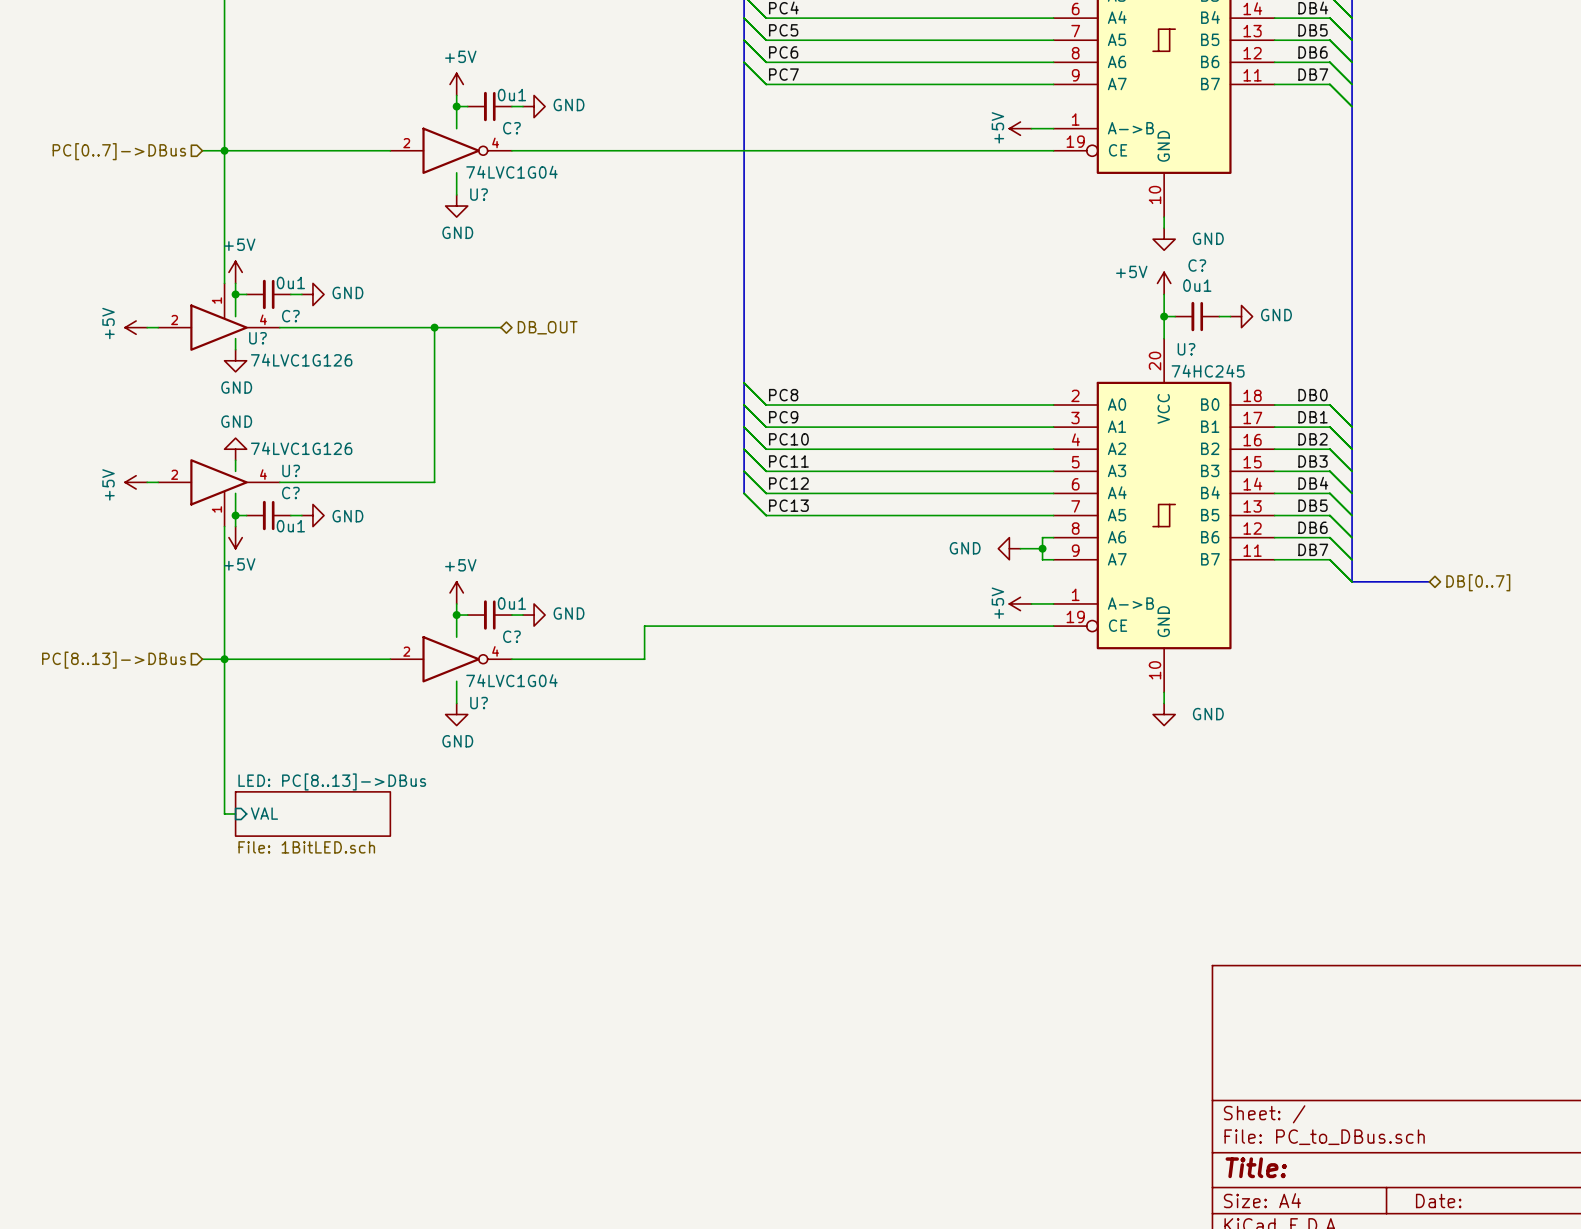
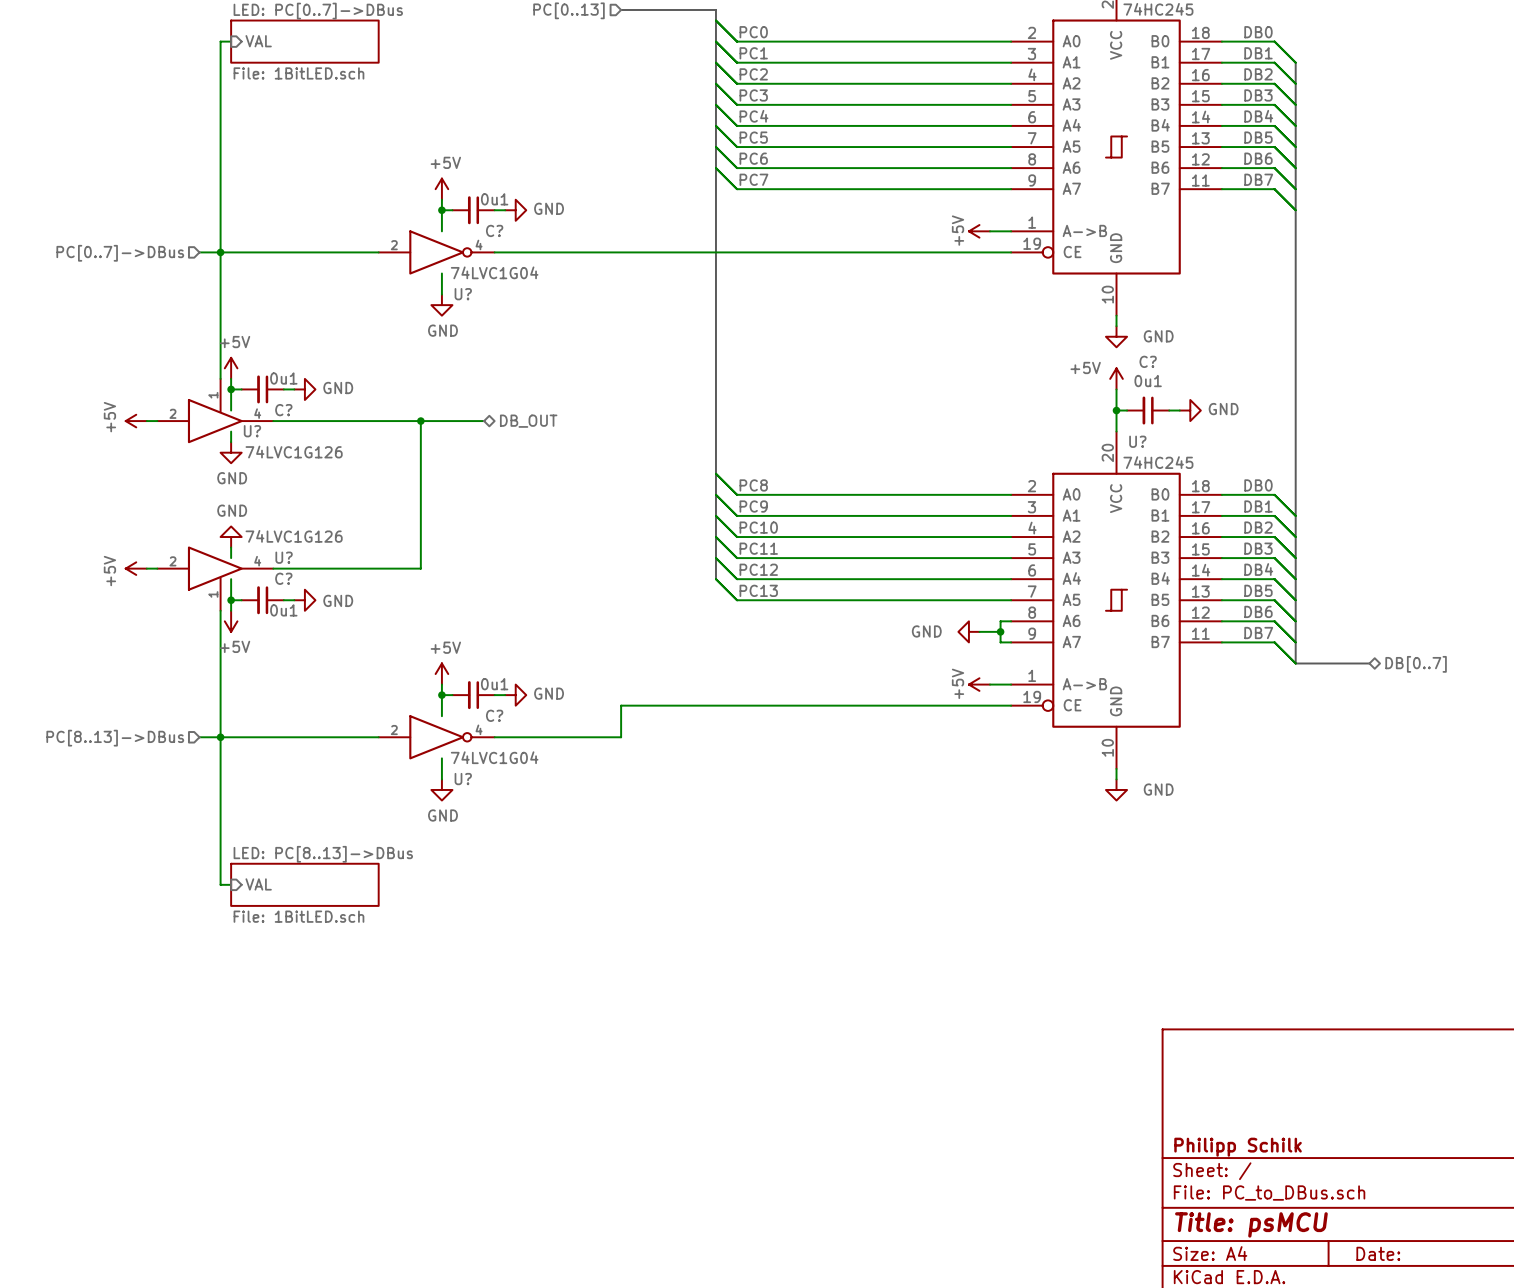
title block: none -> Philipp Schilk (1238, 1147)
title block: Title: (1256, 1167) -> Title: psMCU (1251, 1224)

